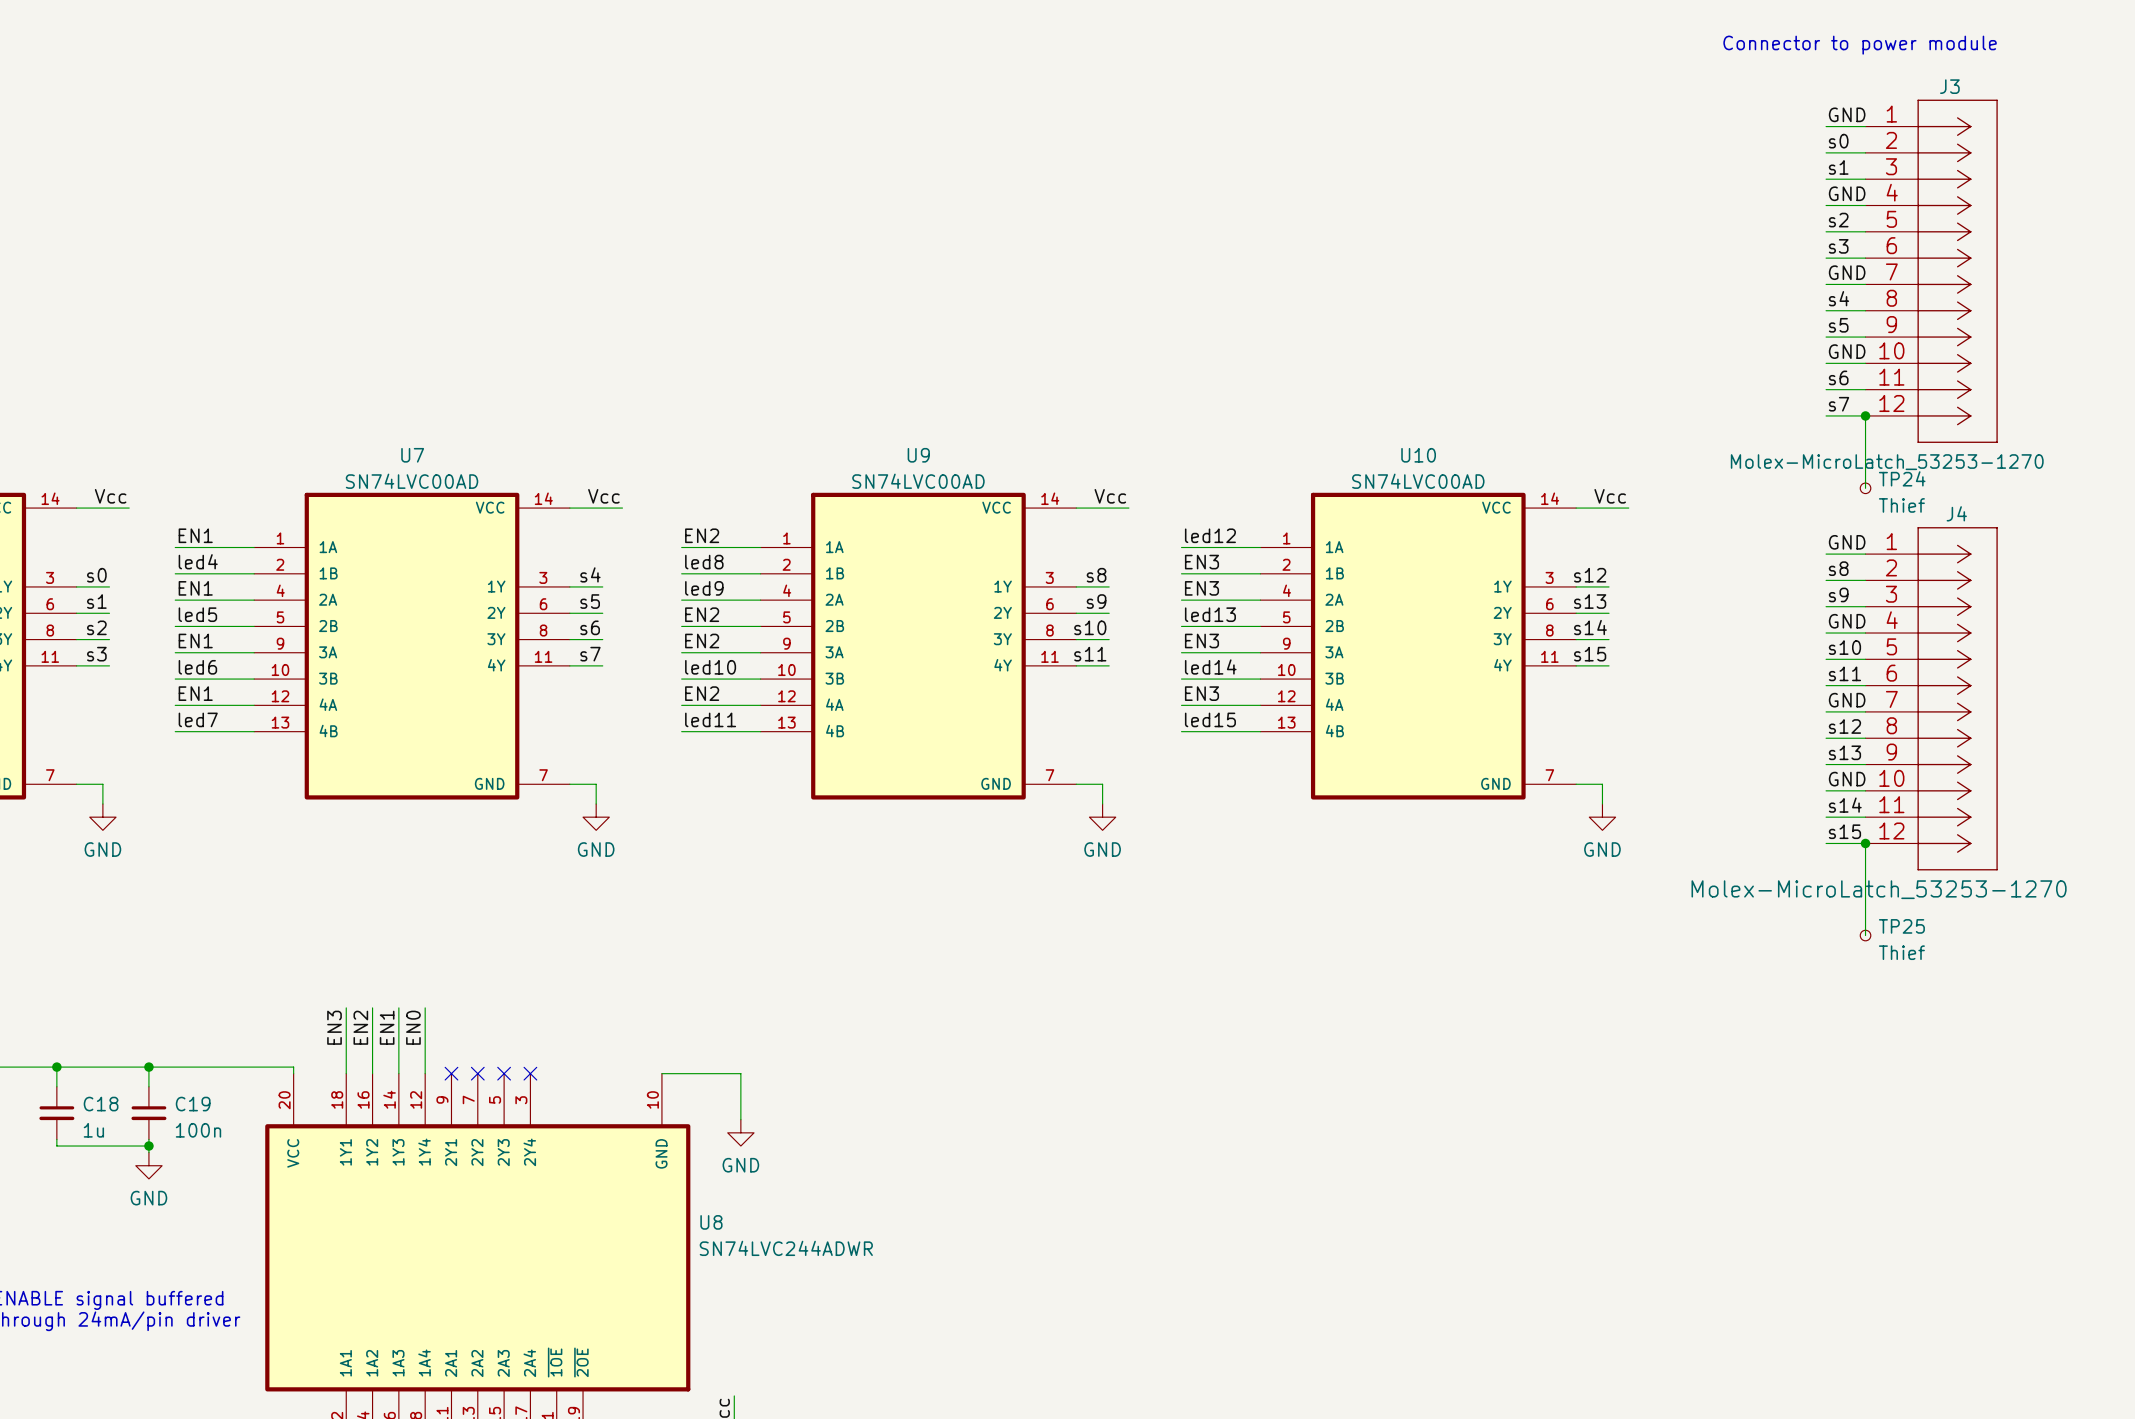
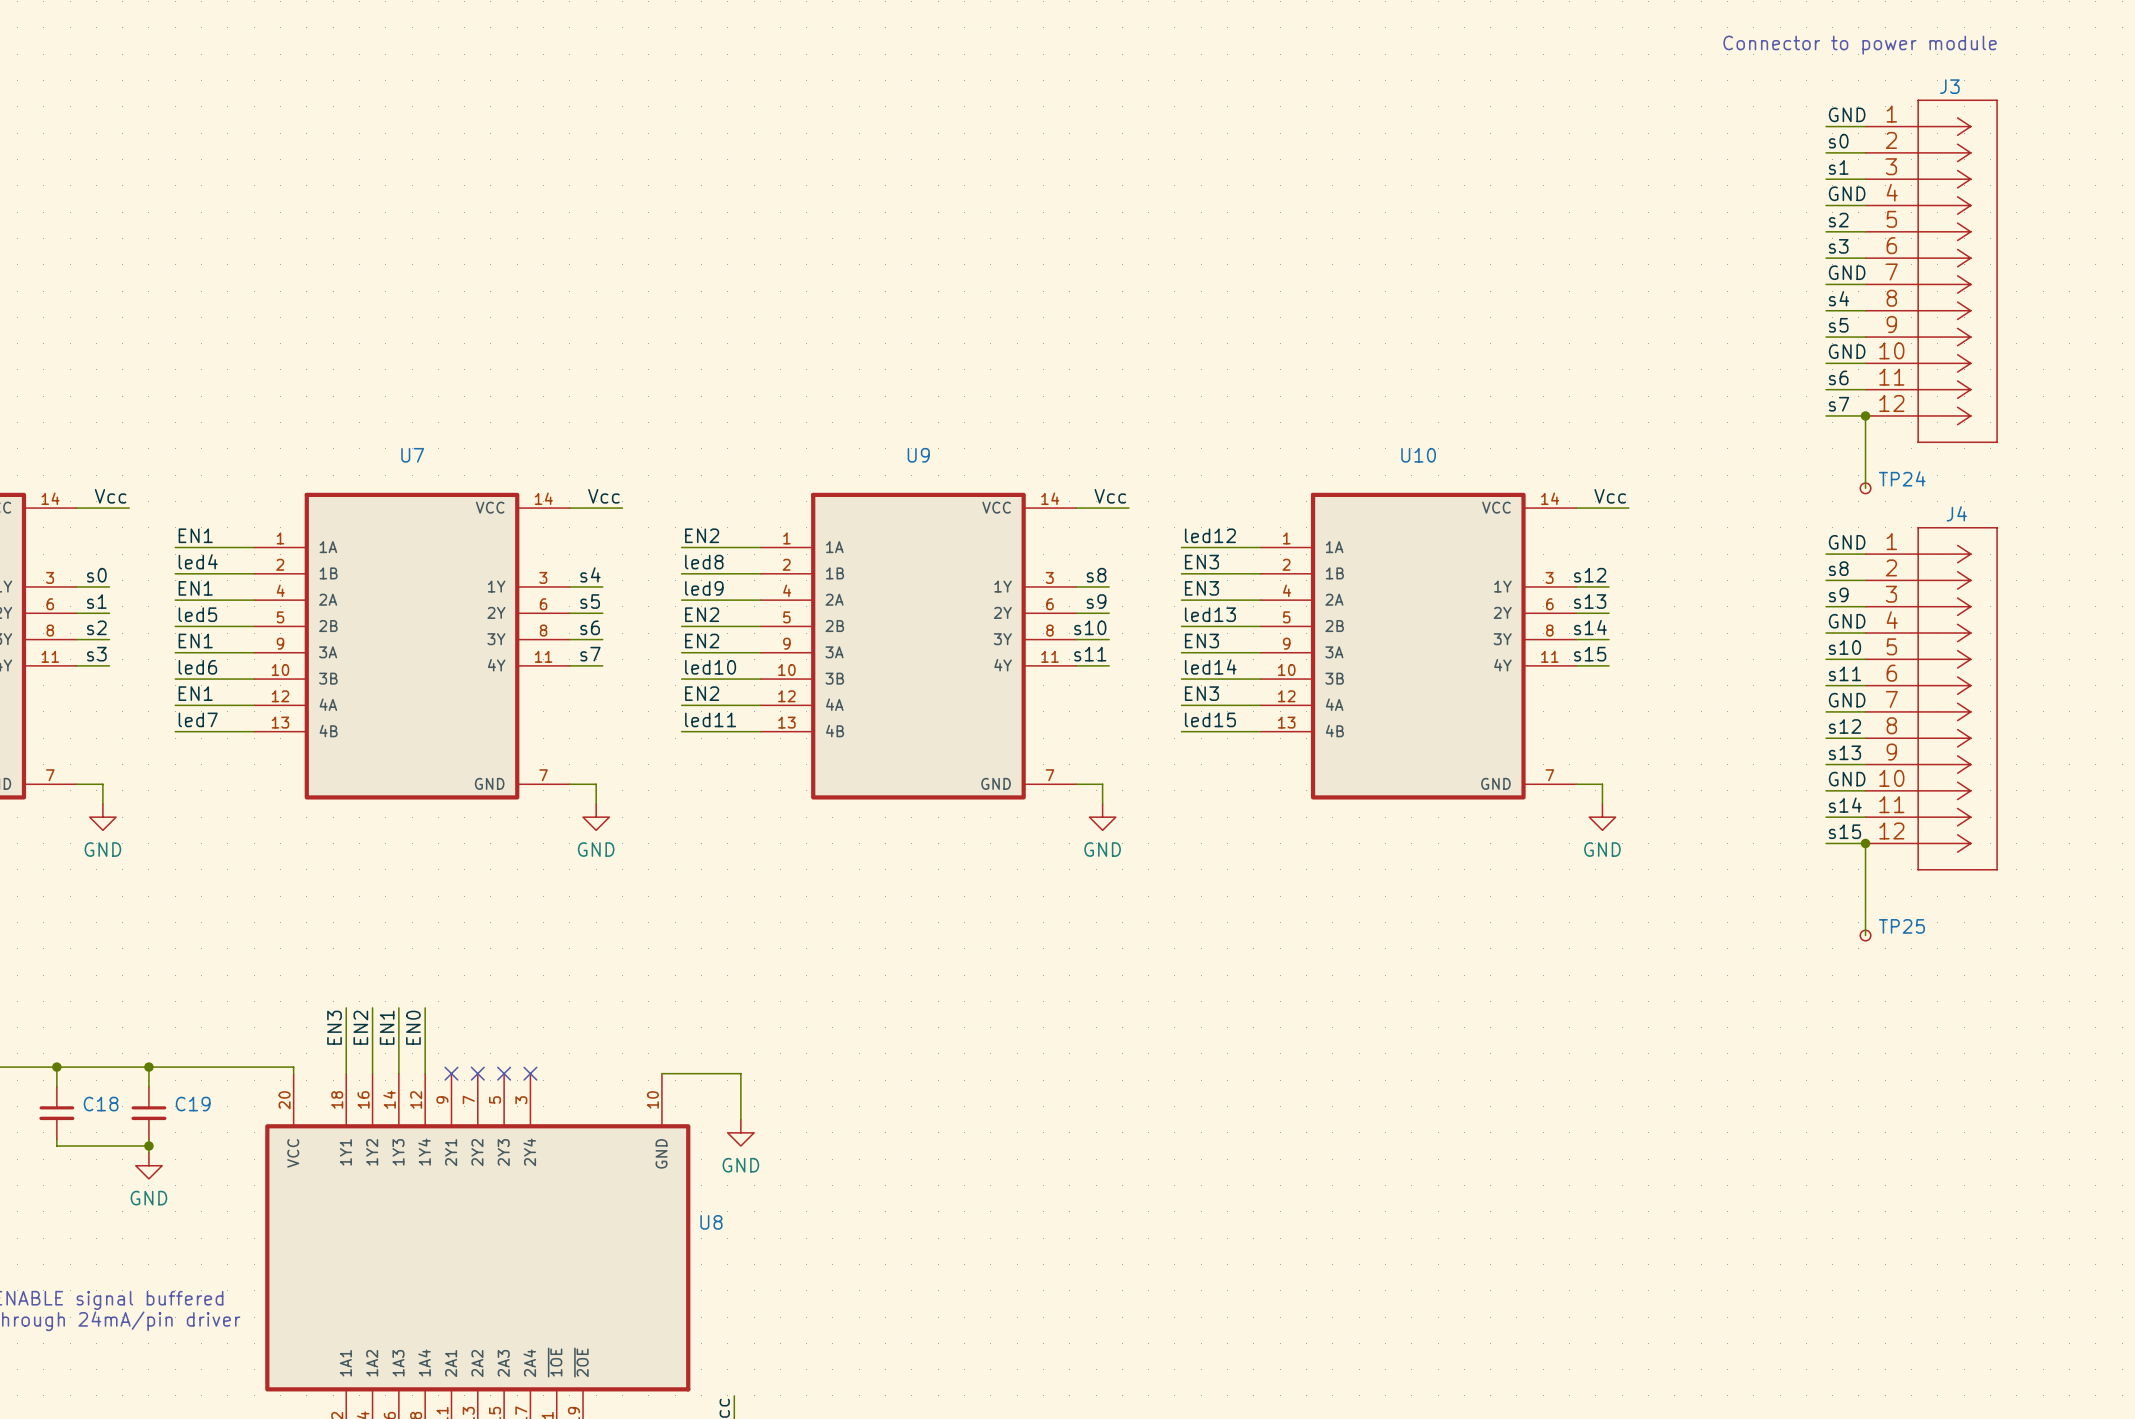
J3 value: Molex-MicroLatch_53253-1270 (1887, 462) -> none
U7 value: SN74LVC00AD (412, 481) -> none
U9 value: SN74LVC00AD (918, 481) -> none
U10 value: SN74LVC00AD (1418, 481) -> none
TP24 value: Thief (1901, 505) -> none
J4 value: Molex-MicroLatch_53253-1270 (1879, 889) -> none
TP25 value: Thief (1901, 952) -> none
C18 value: 1u (93, 1130) -> none
C19 value: 100n (198, 1130) -> none
U8 value: SN74LVC244ADWR (786, 1248) -> none

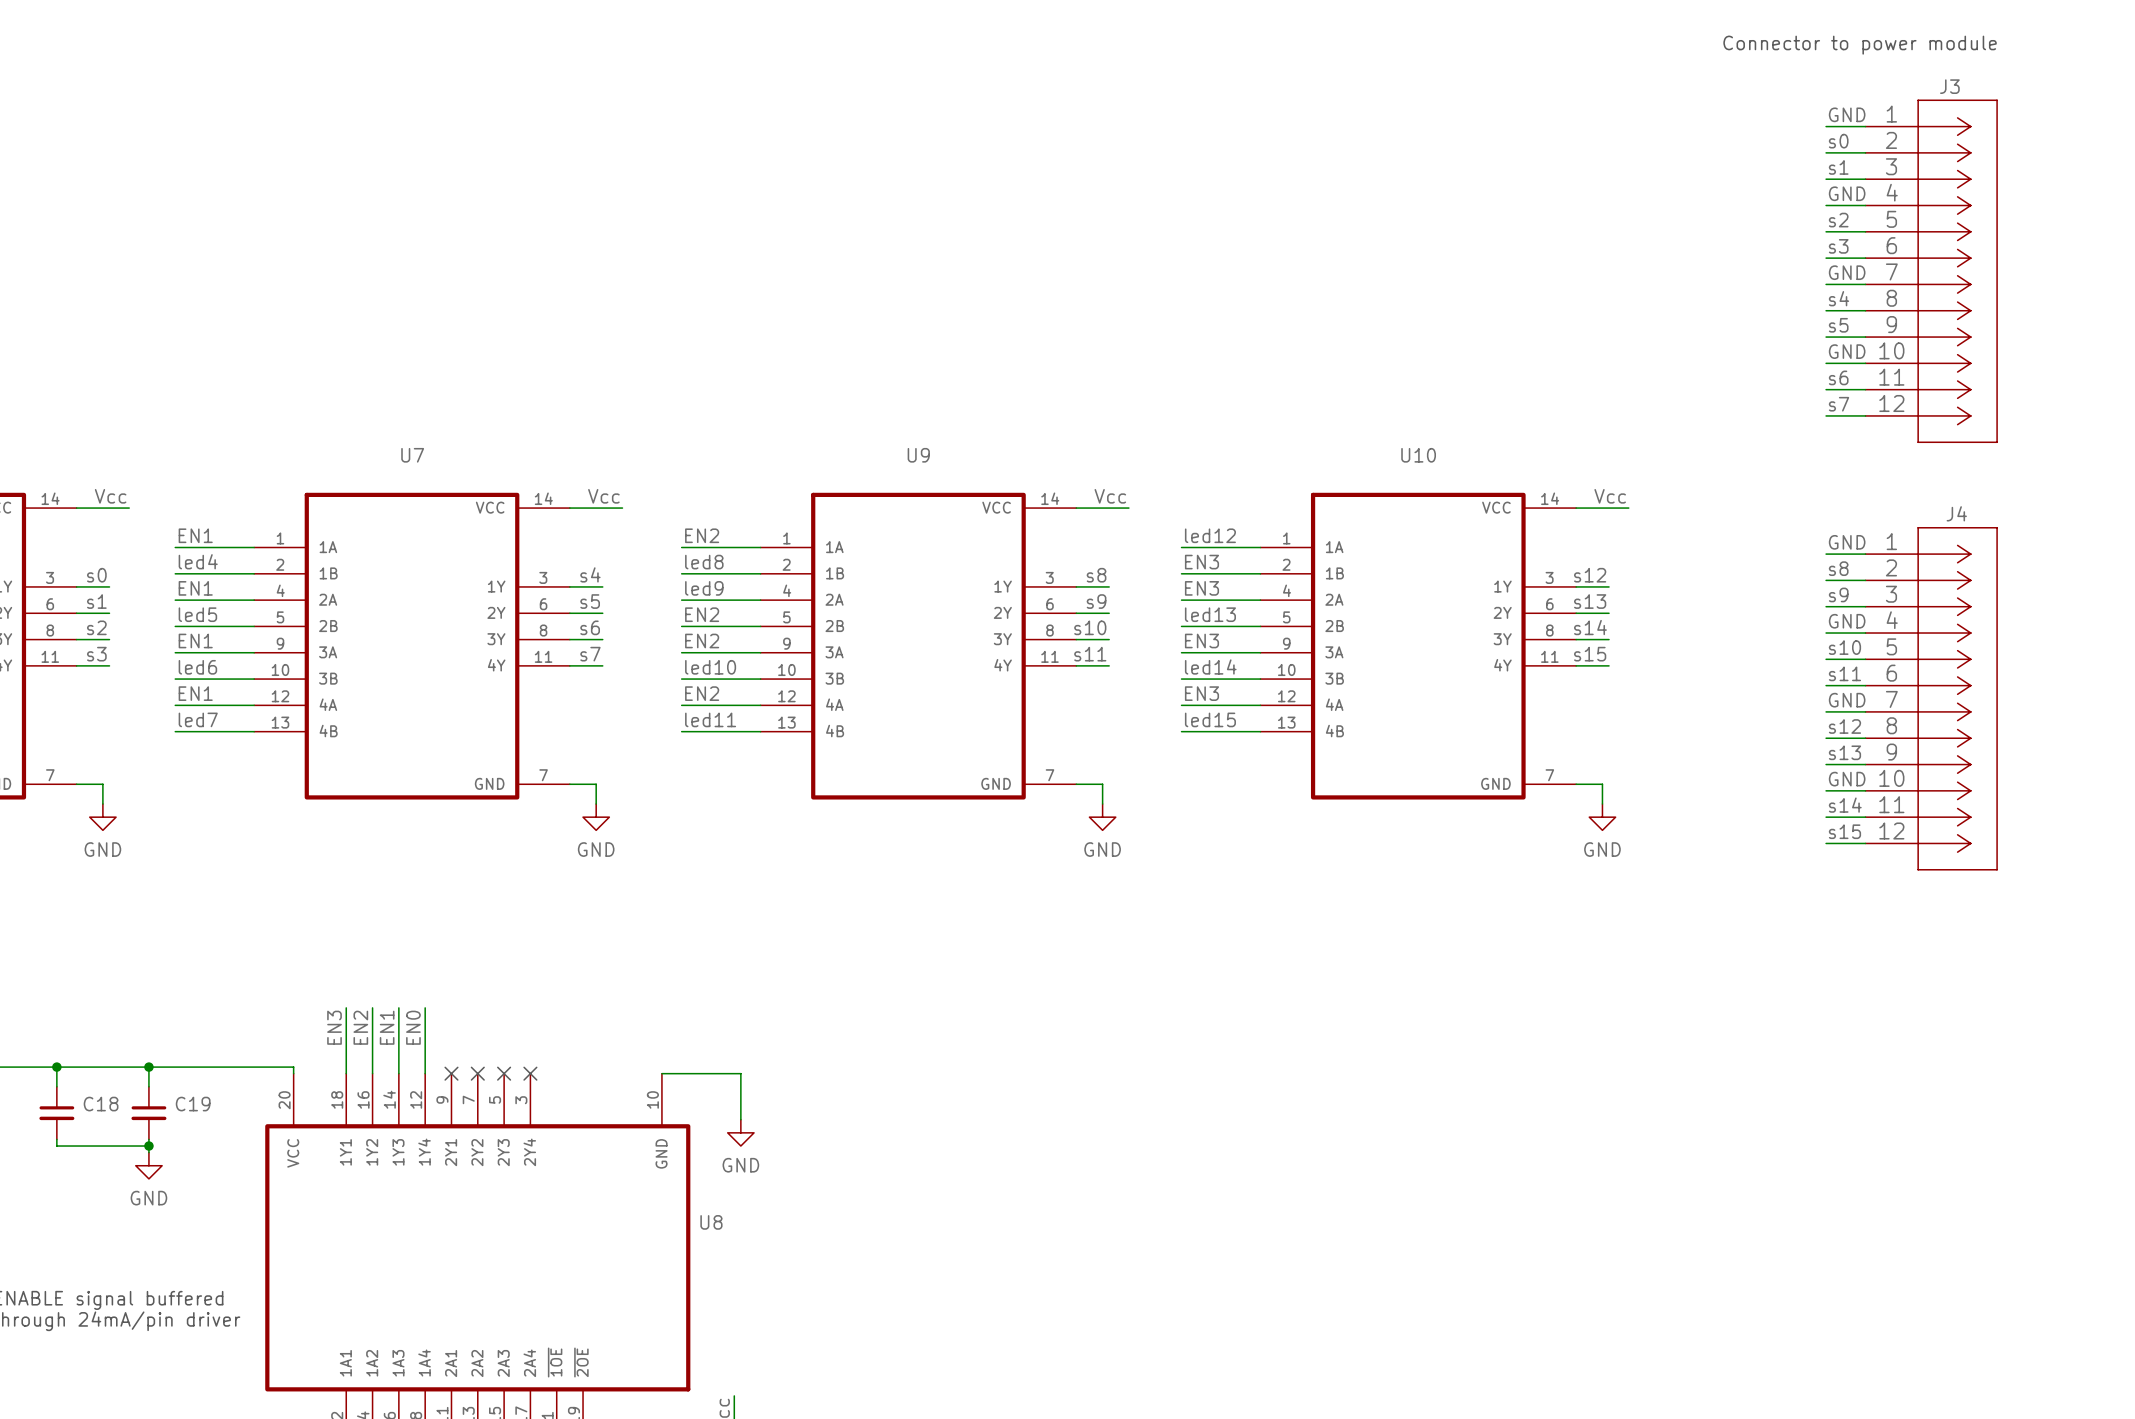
wire: (1865, 415) (1865, 488) -> none
junction: (1865, 415) -> none
TP24: (1865, 488) -> none
wire: (1865, 843) (1865, 935) -> none
junction: (1865, 843) -> none
TP25: (1865, 935) -> none

